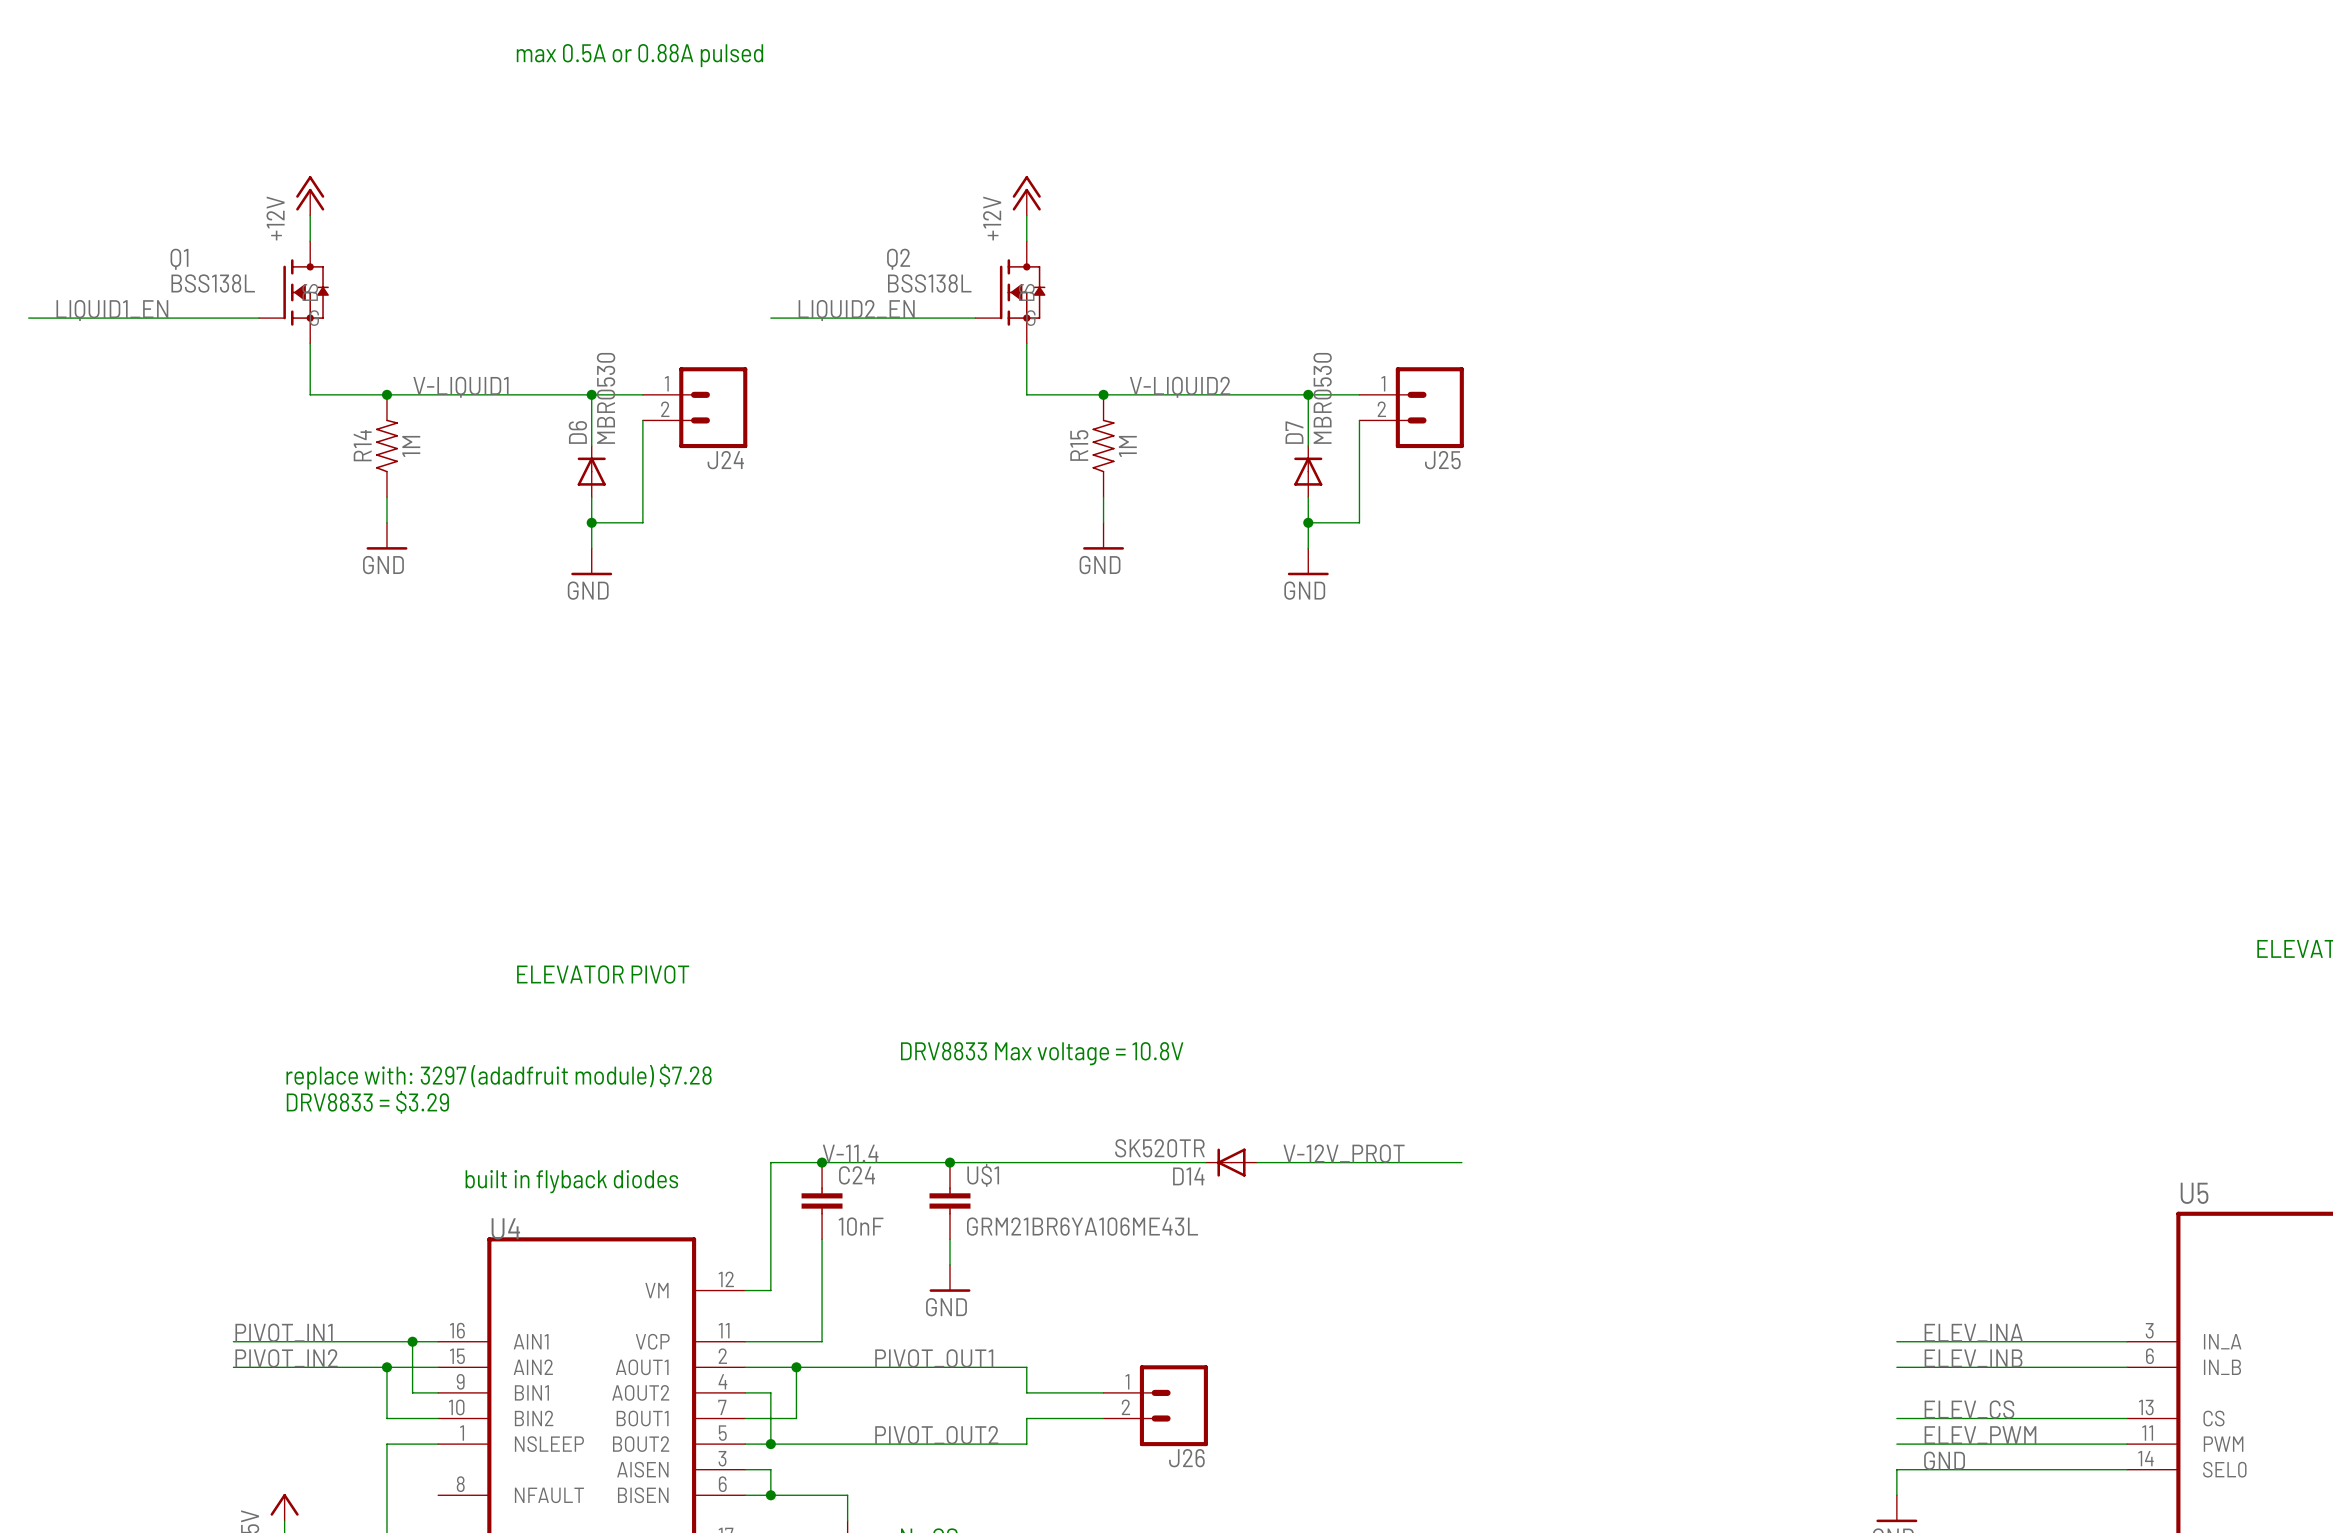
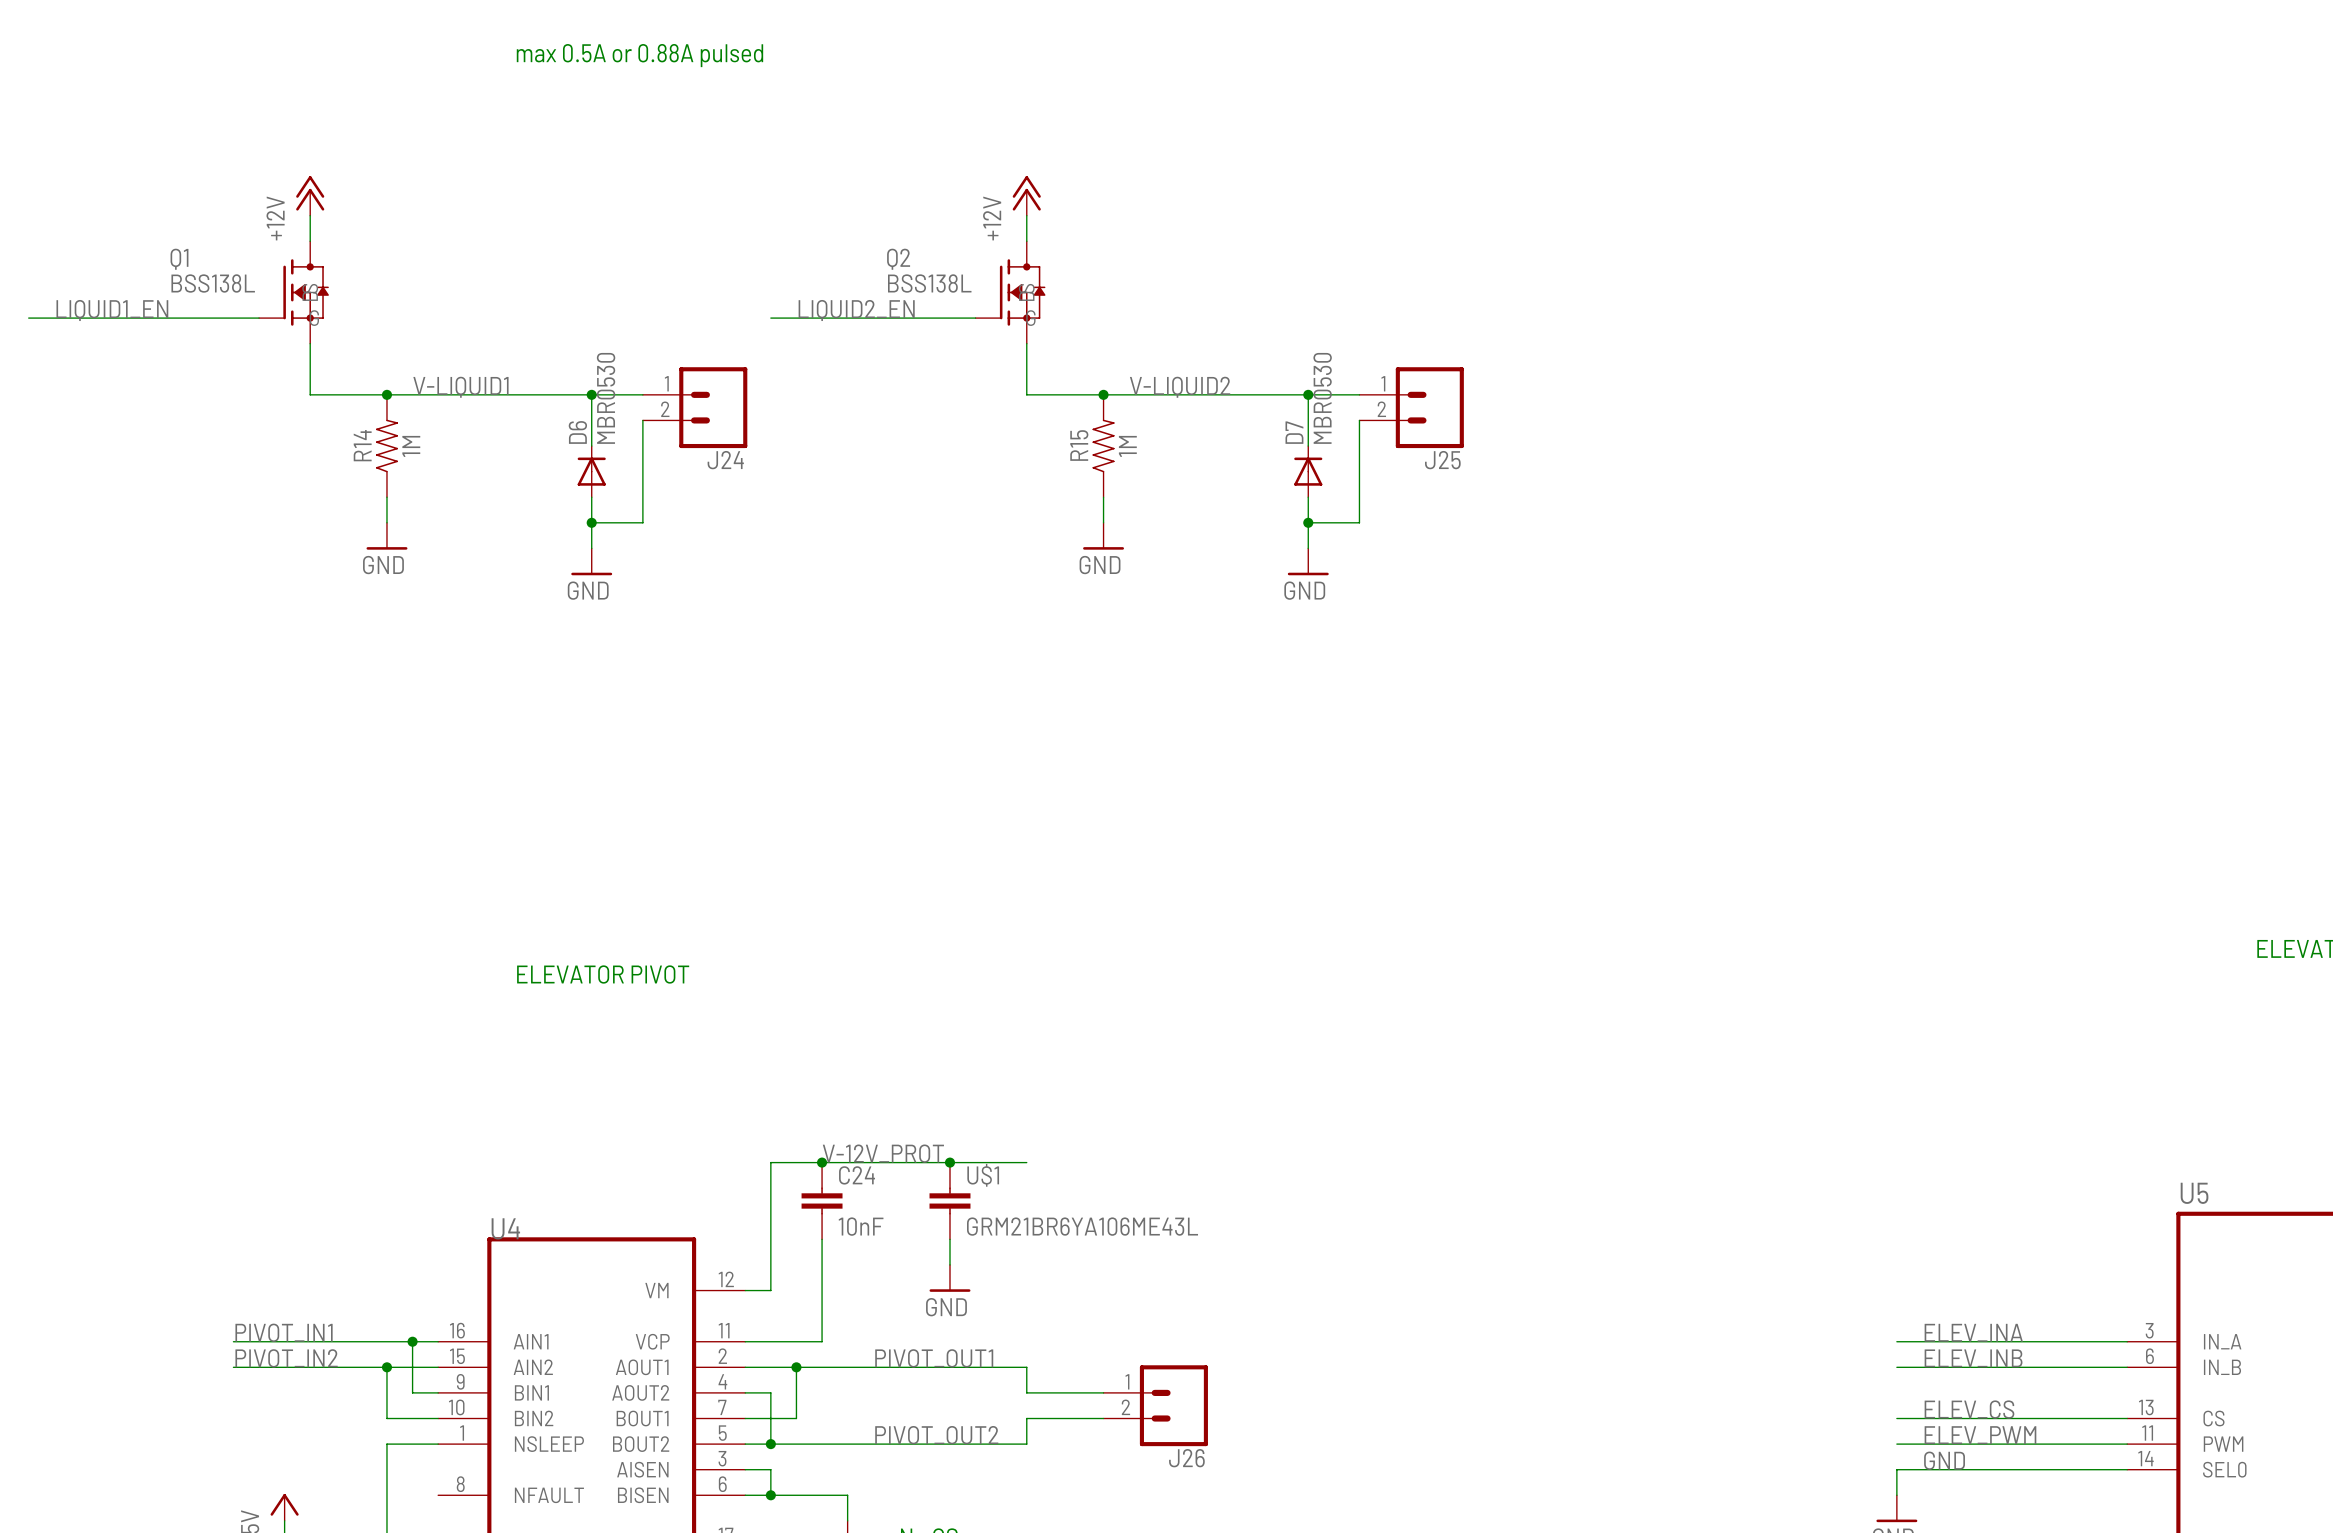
text: DRV8833 Max voltage = 10.8V (1042, 1053) -> none
text: replace with: 3297 (adadfruit module) $7.28 (499, 1076) -> none
text: DRV8833 = $3.29 (367, 1102) -> none
label: V-11.4 (850, 1153) -> V-12V_PROT (883, 1153)
label: V-12V_PROT (1344, 1153) -> none
wire: (1026, 1162) (1205, 1162) -> none
D14: SK520TR (1231, 1162) -> none
wire: (1257, 1162) (1461, 1162) -> none
text: built in flyback diodes (571, 1181) -> none

